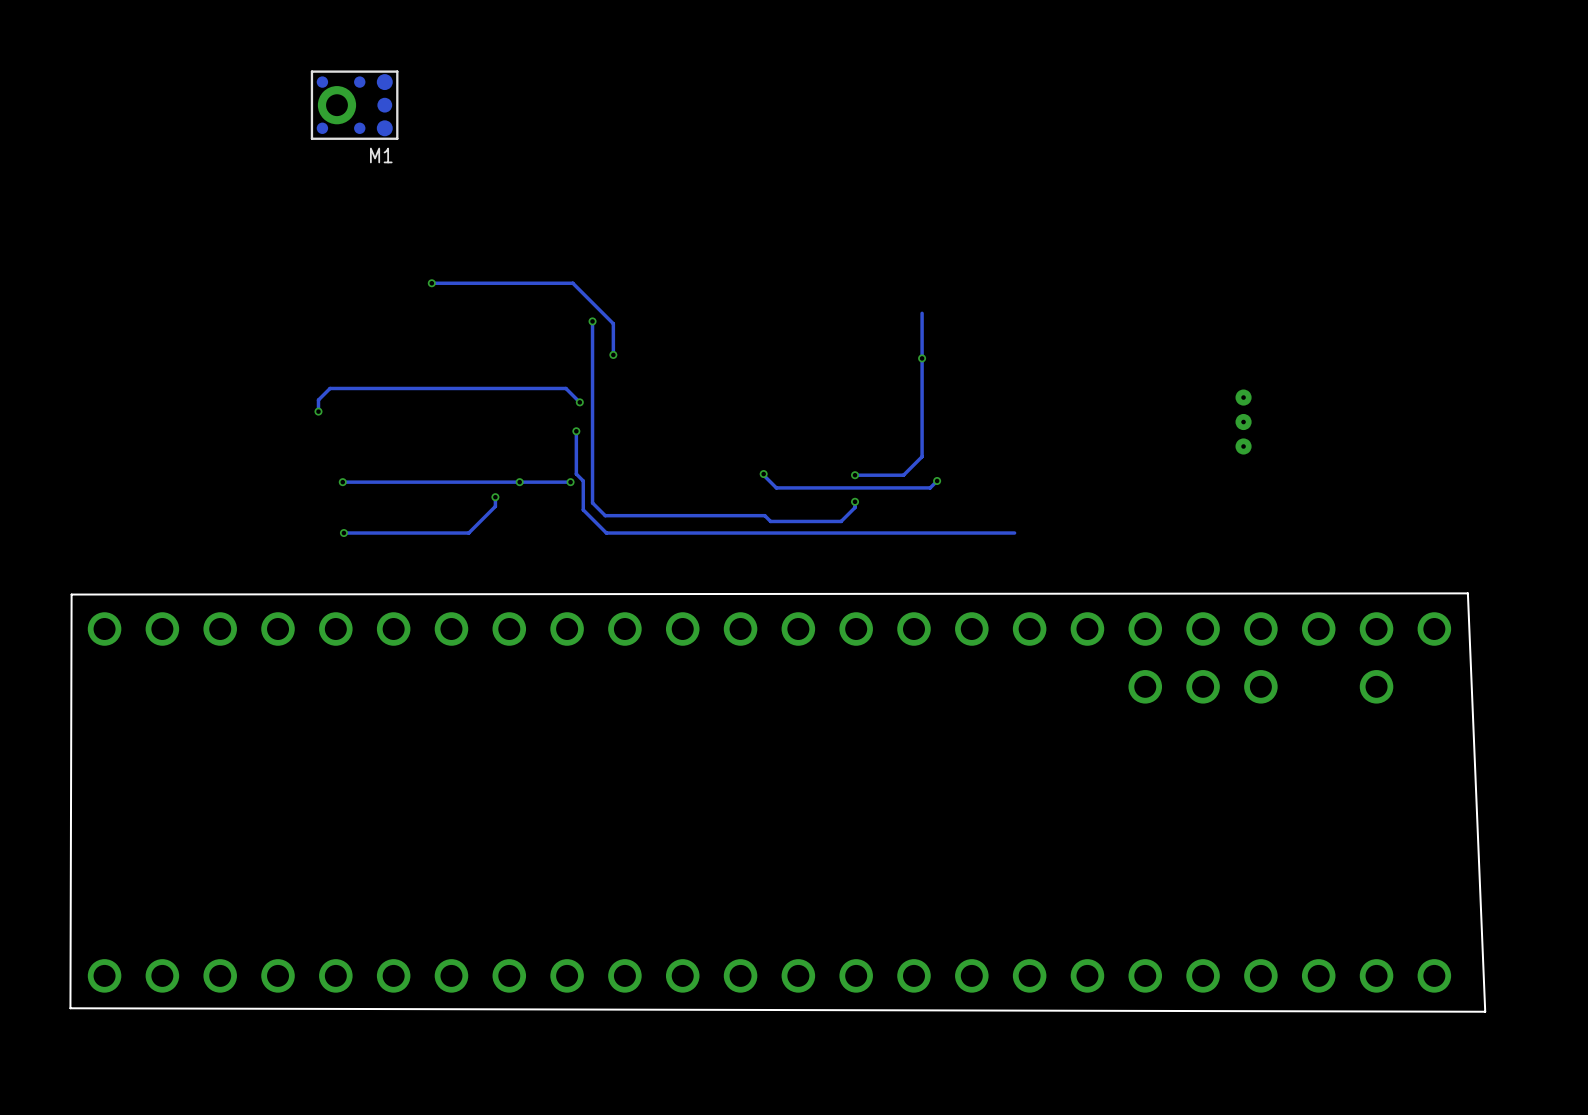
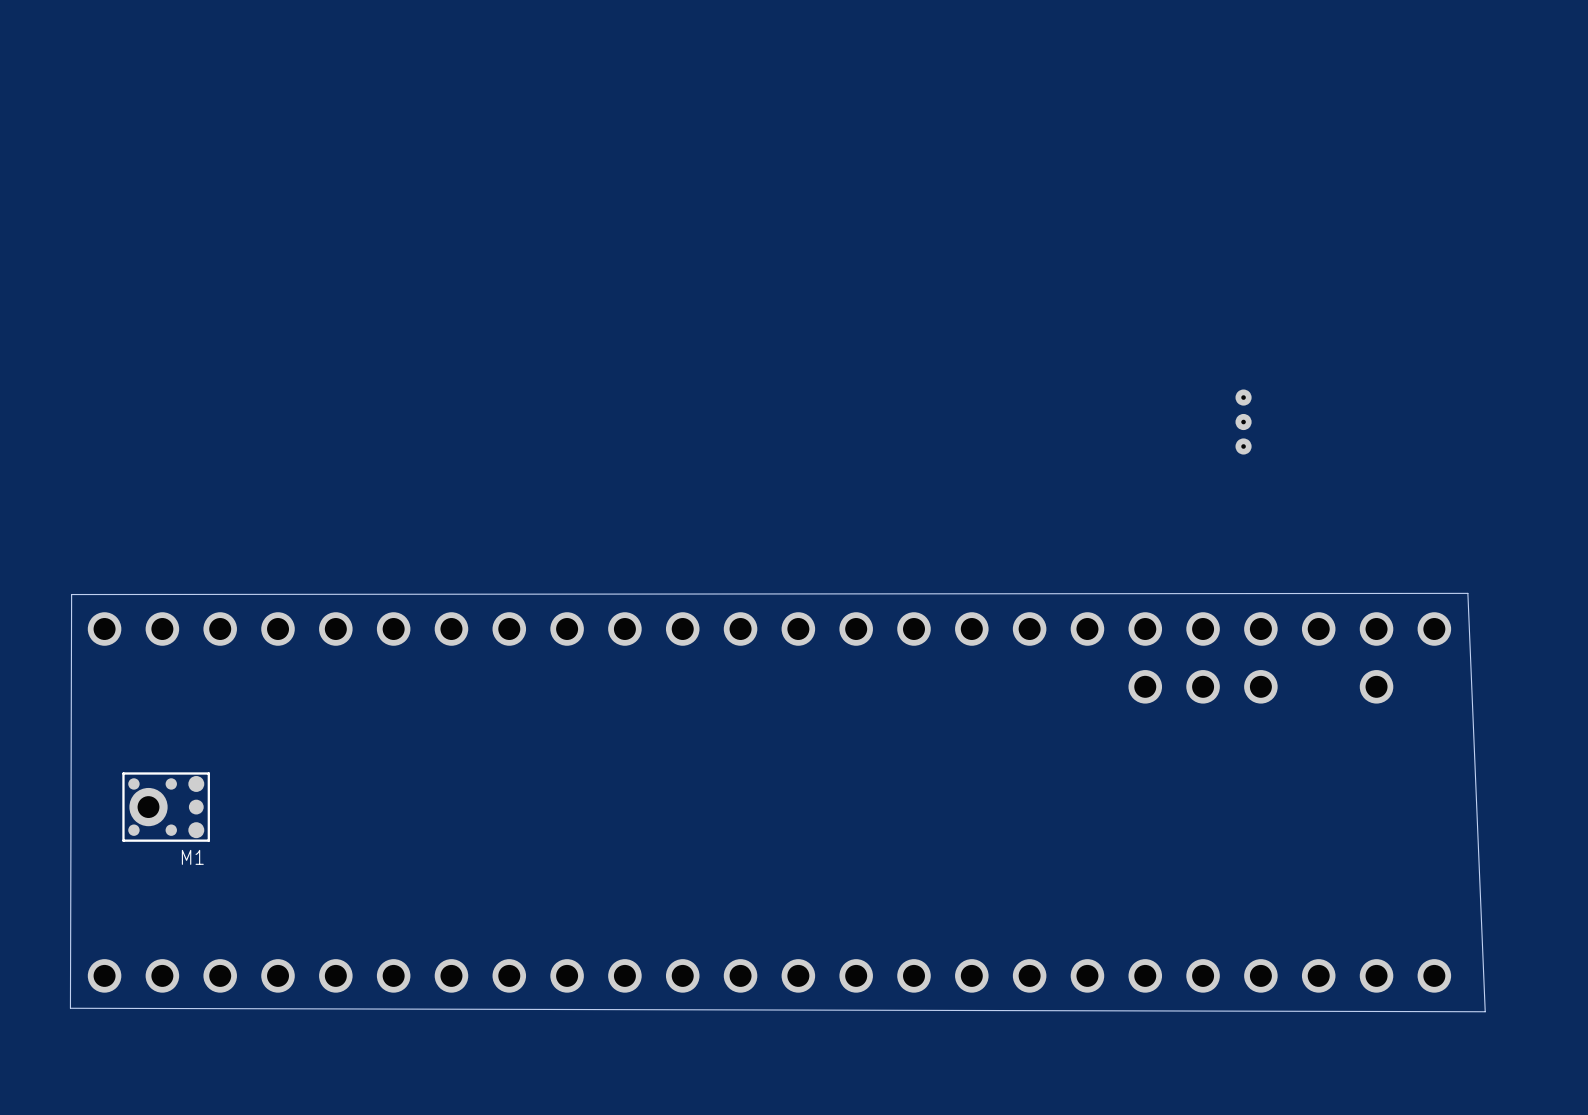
M1 position: (354, 105) -> (166, 807)
track: (431, 283) (572, 283) (613, 323) (613, 354) -> none
via: (431, 283) -> none
track: (922, 313) (922, 456) (903, 475) (855, 475) -> none
track: (592, 321) (592, 502) (605, 515) (764, 515) (770, 521) (841, 521) (855, 507) (855, 501) -> none
via: (592, 321) -> none
via: (613, 354) -> none
via: (922, 358) -> none
track: (579, 402) (565, 388) (330, 388) (318, 400) (318, 411) -> none
via: (579, 402) -> none
via: (318, 411) -> none
track: (576, 431) (576, 474) (583, 480) (583, 509) (606, 533) (1014, 533) -> none
via: (576, 431) -> none
track: (763, 474) (776, 487) (930, 487) (937, 480) -> none
via: (763, 474) -> none
via: (855, 475) -> none
via: (937, 480) -> none
via: (342, 482) -> none
via: (519, 482) -> none
track: (570, 482) (342, 482) -> none
via: (570, 482) -> none
track: (495, 497) (495, 506) (468, 533) (343, 533) -> none
via: (495, 497) -> none
via: (855, 501) -> none
via: (343, 533) -> none

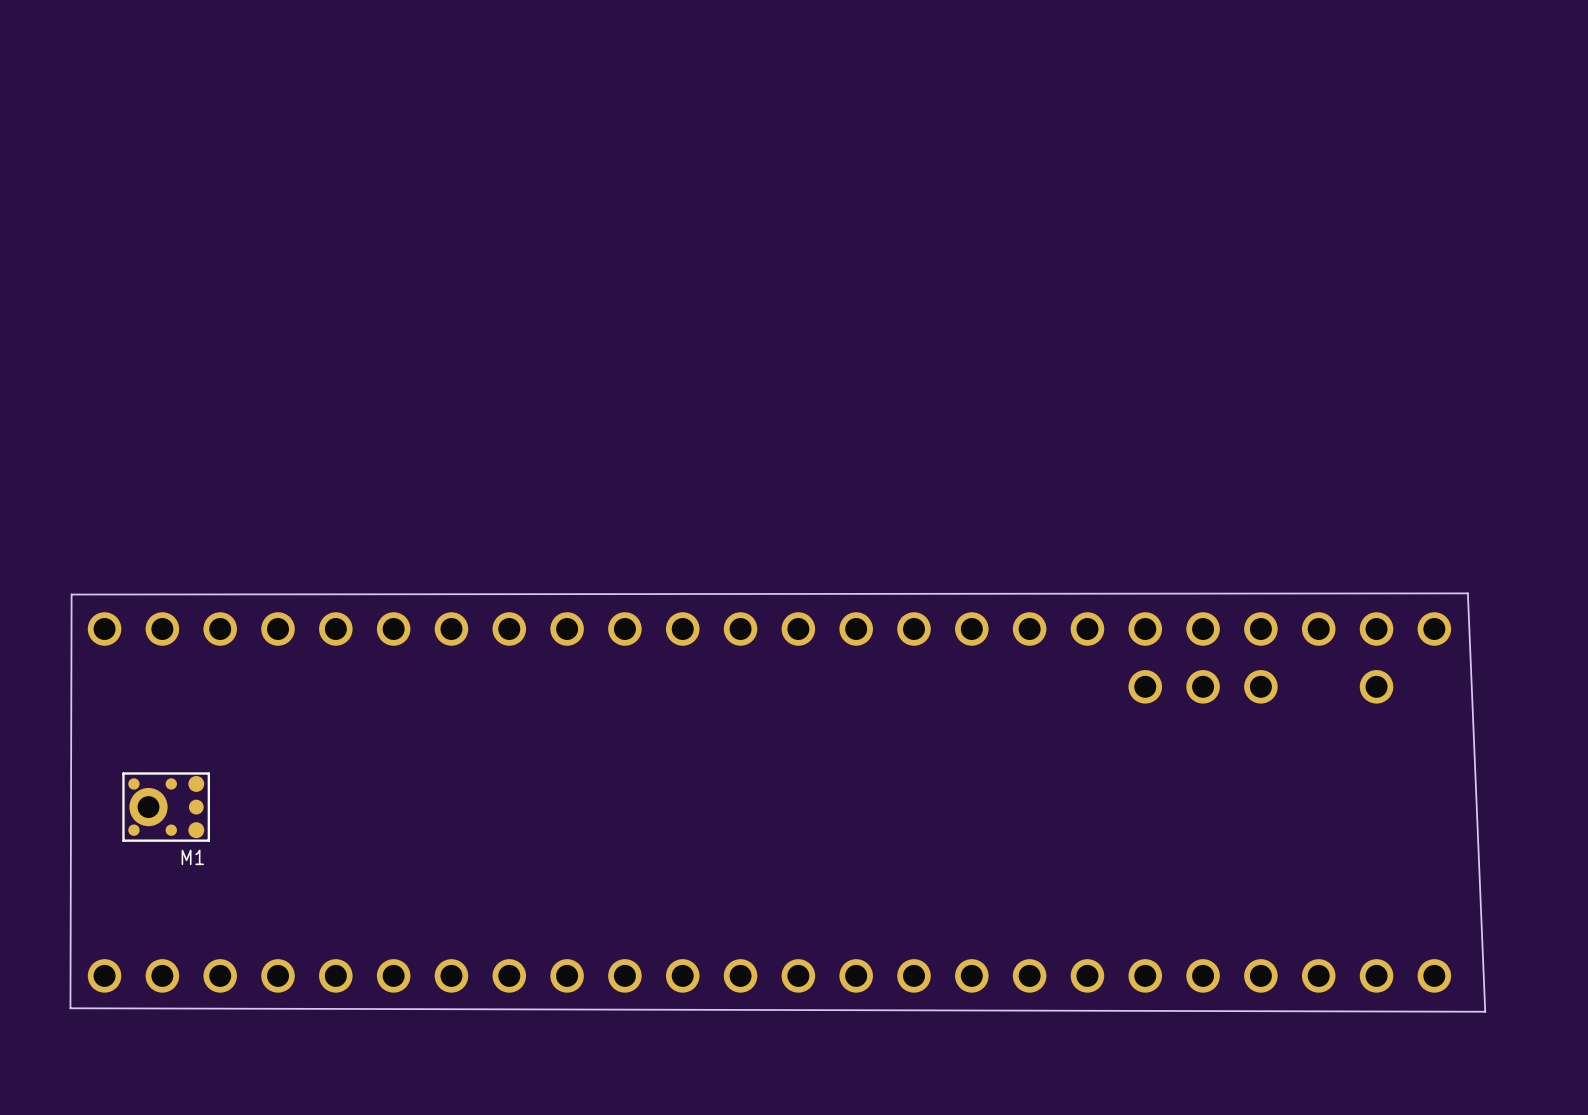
part: (1243, 422) -> none

